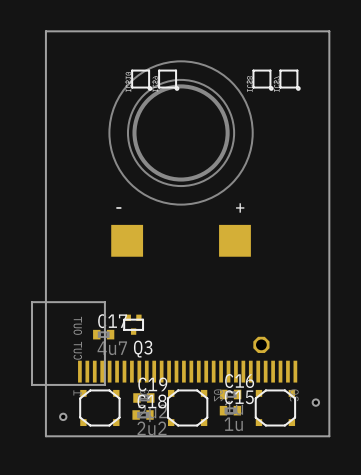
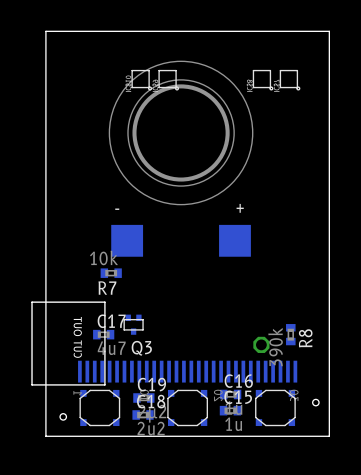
R7: none -> 10k (111, 273)
R8: none -> 390k (290, 334)

